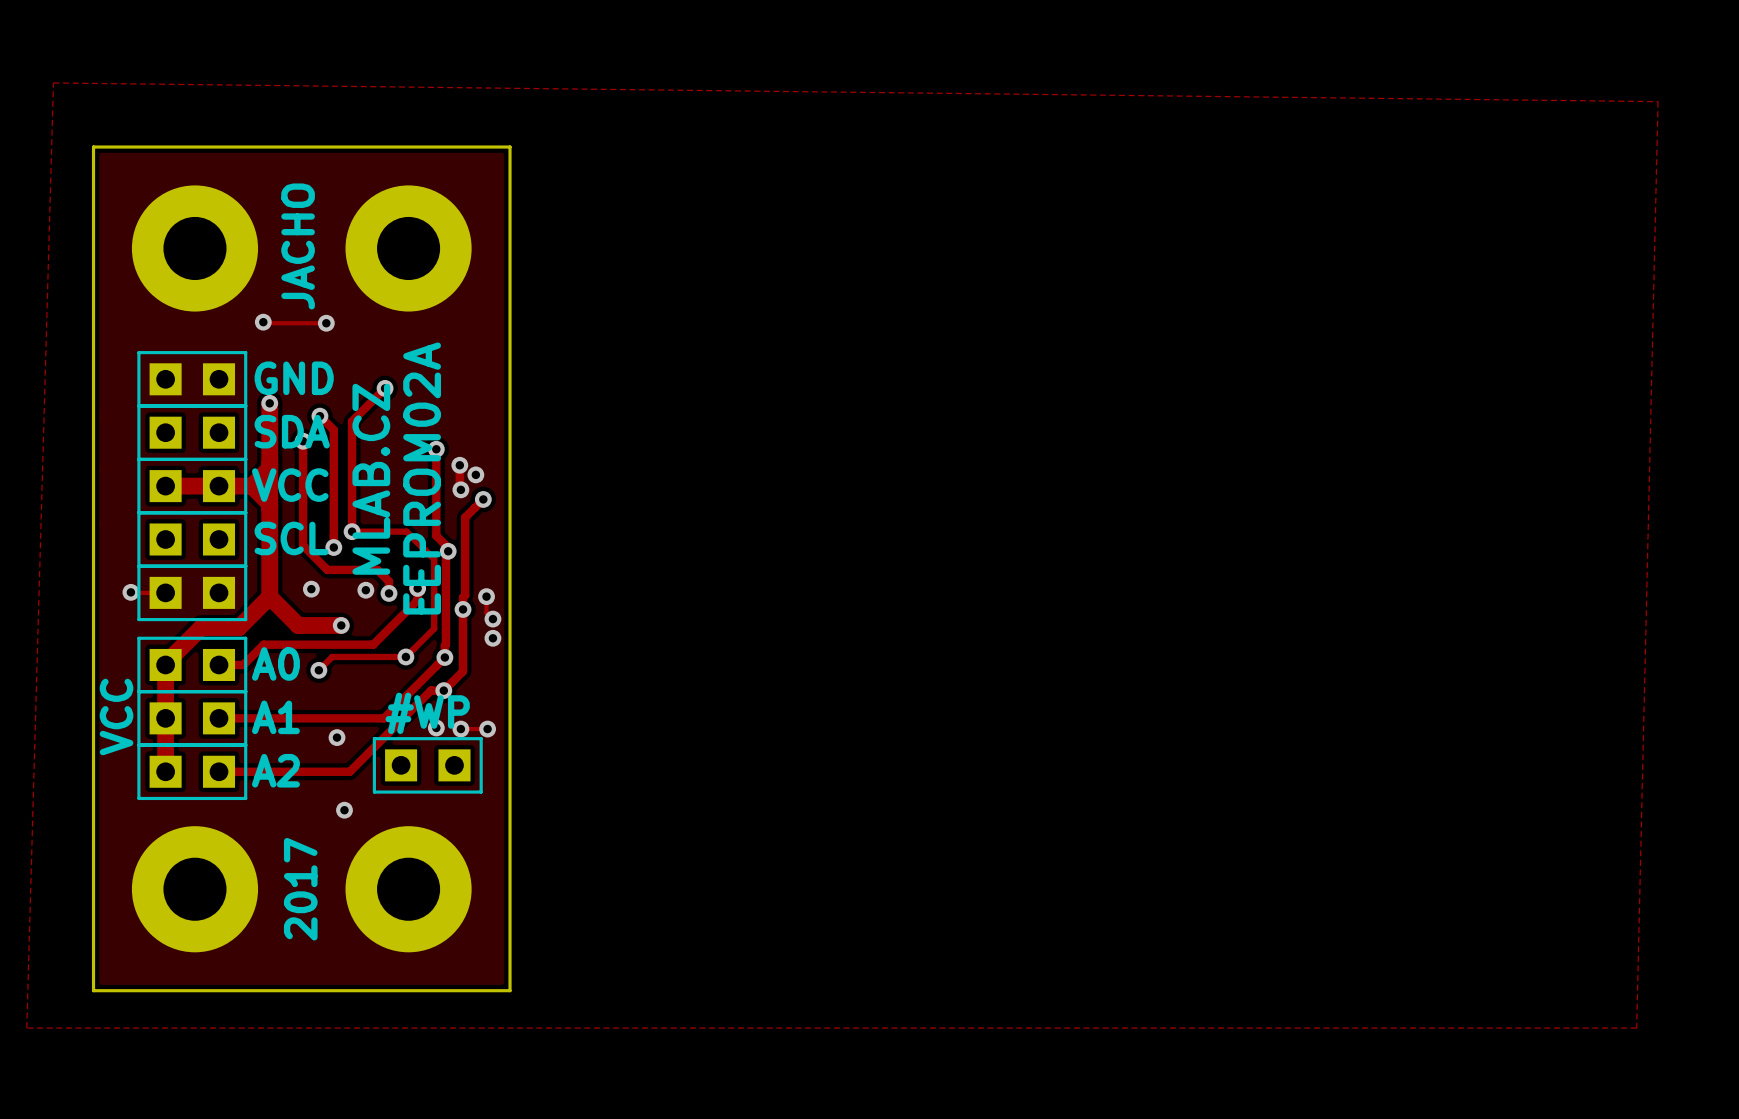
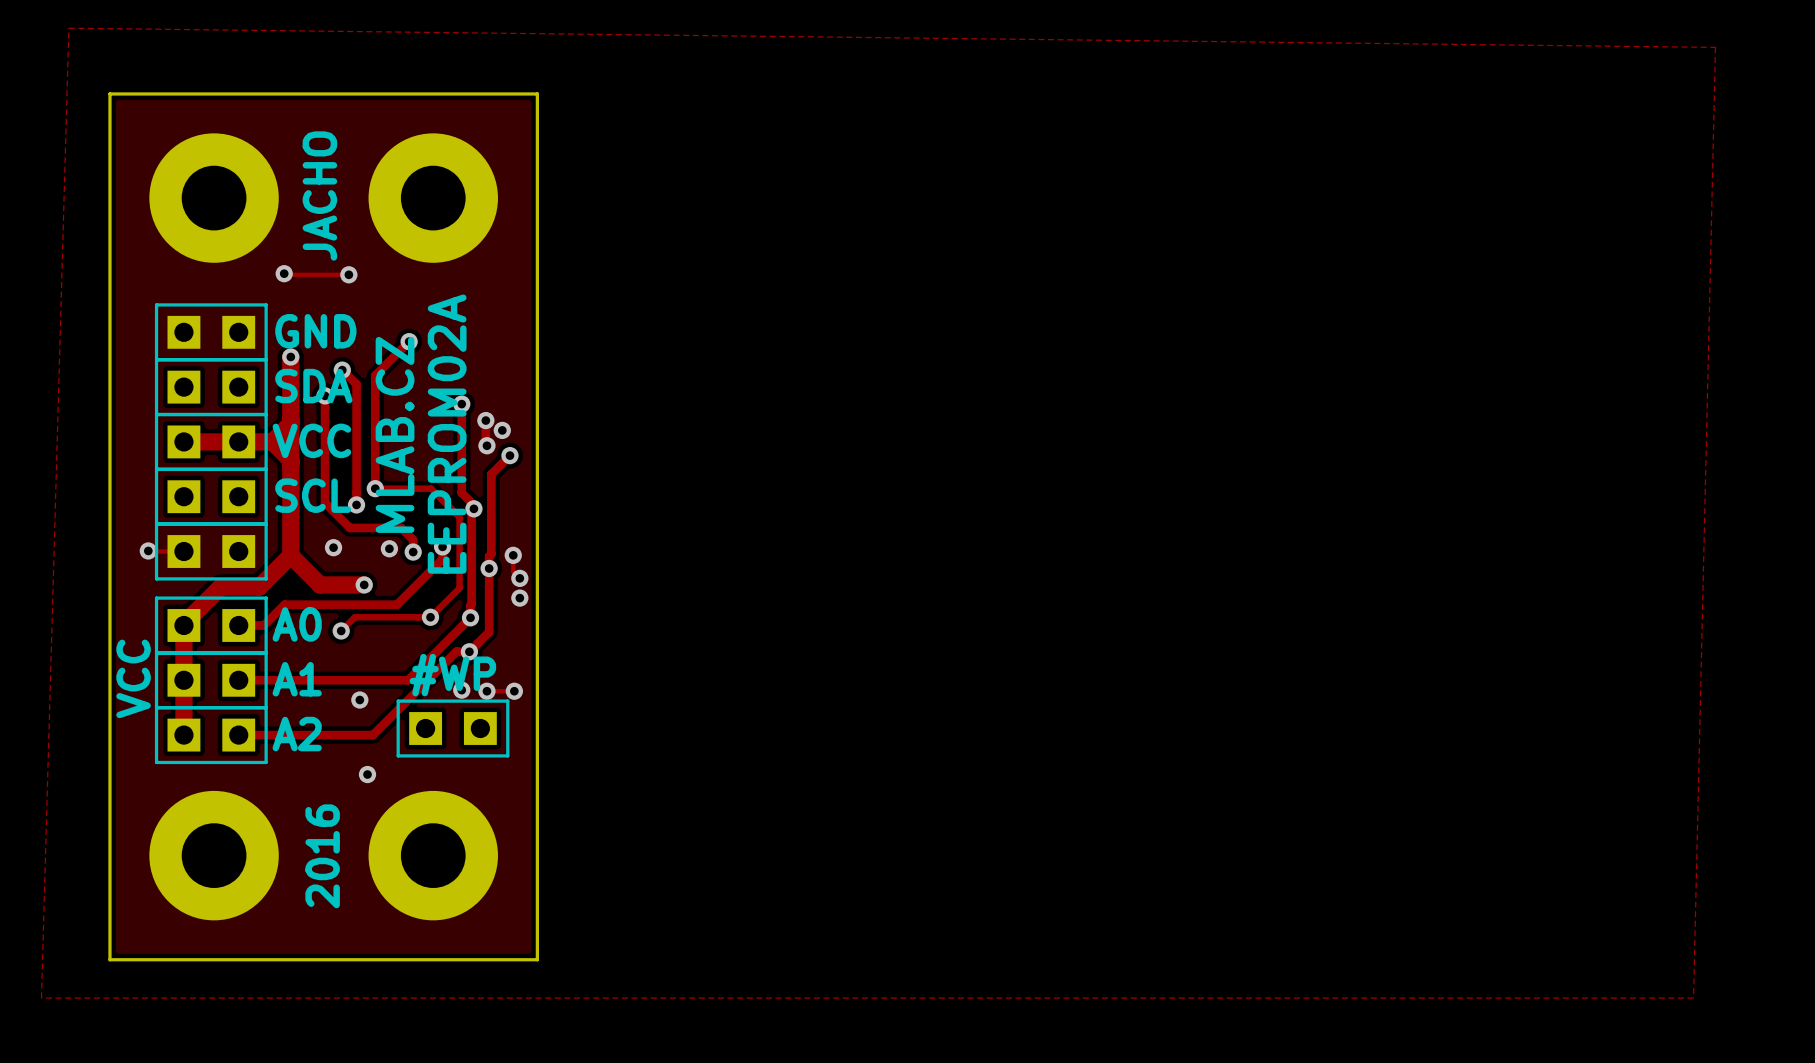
text: 2017 (300, 889) -> 2016 (322, 856)

